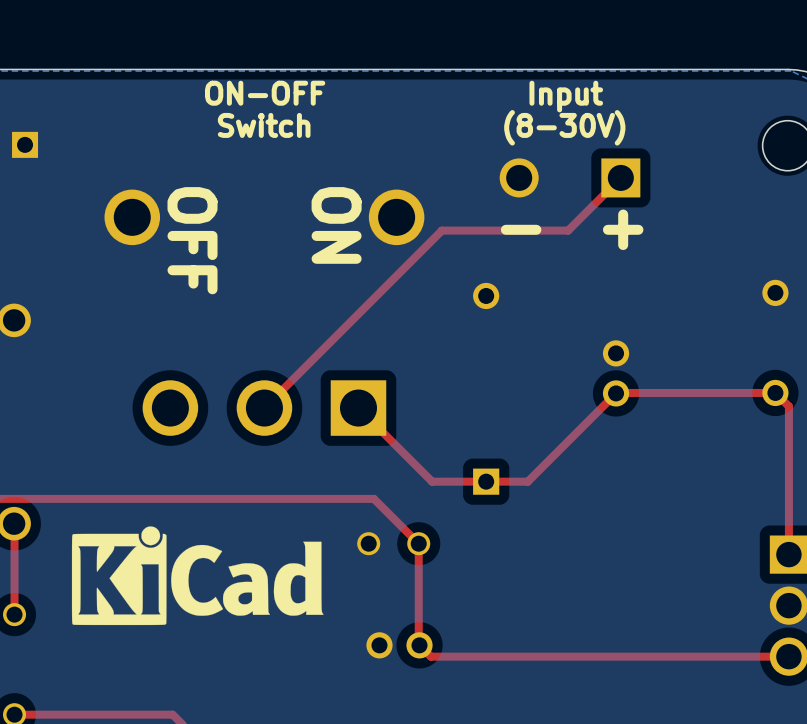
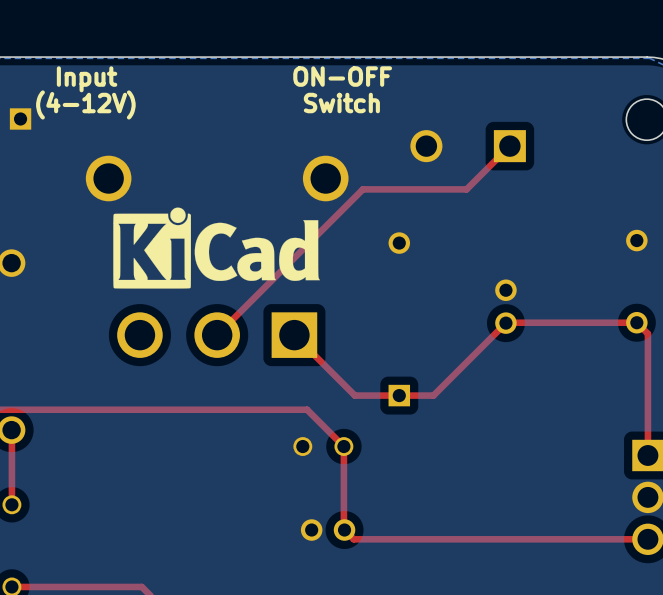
text position: ON-OFF (265, 93) -> ON-OFF (342, 76)
text position: Input (566, 96) -> Input (87, 79)
text position: Switch (264, 125) -> Switch (341, 103)
text: none -> (4-12V) (85, 104)
text: (8-30V) (564, 127) -> none
text: ON (336, 225) -> none
text: - (521, 229) -> none
text: + (623, 229) -> none
text: OFF (192, 240) -> none
drawing position: (197, 575) -> (216, 248)

